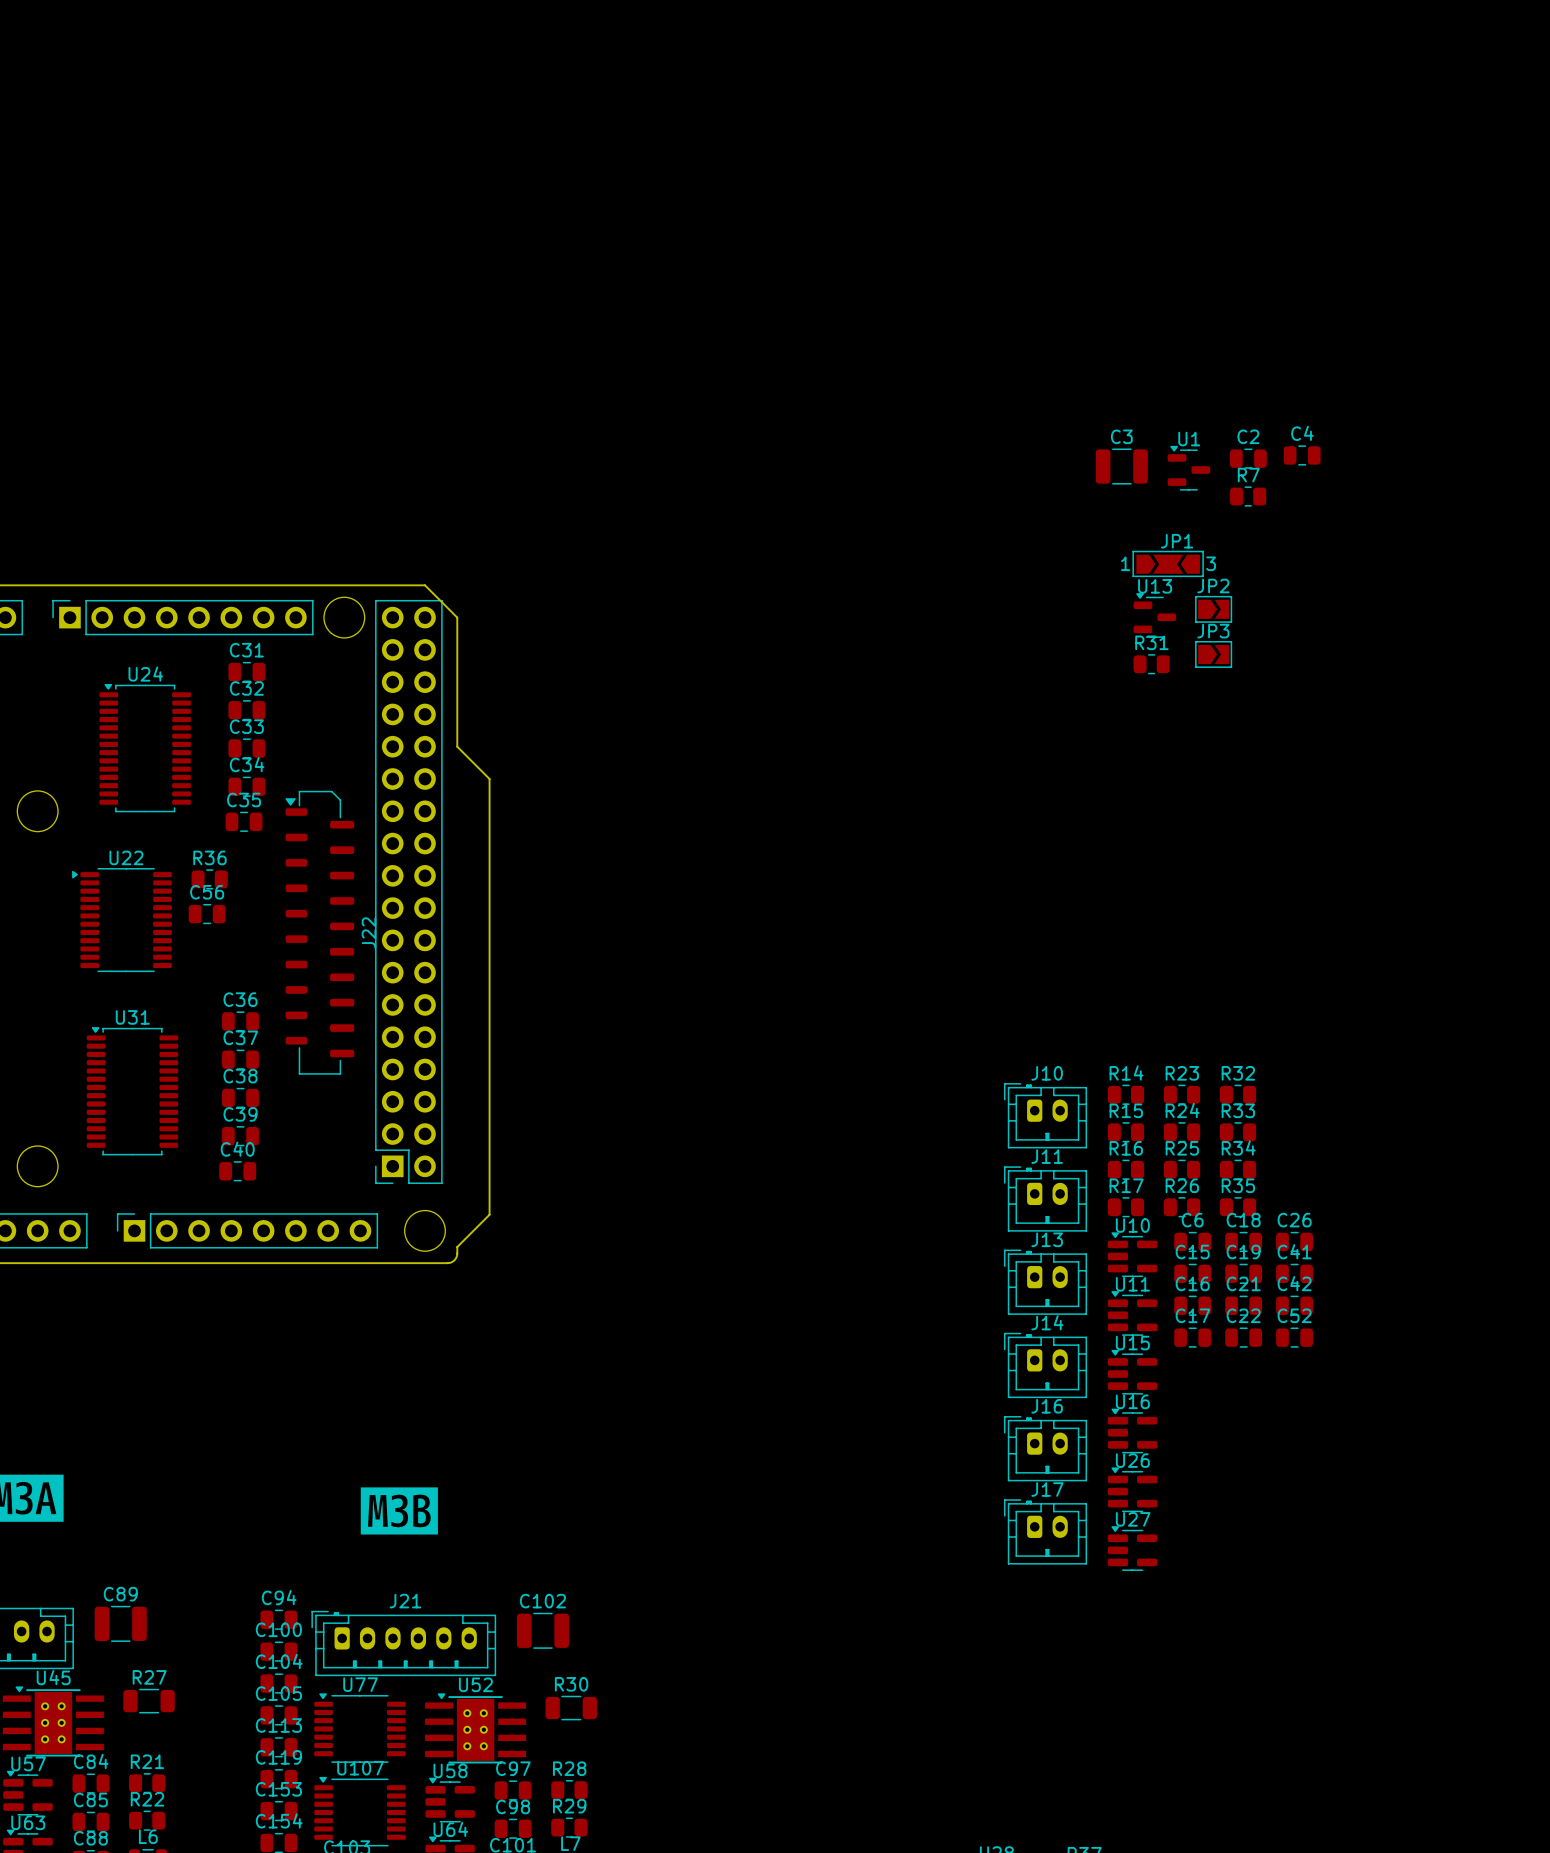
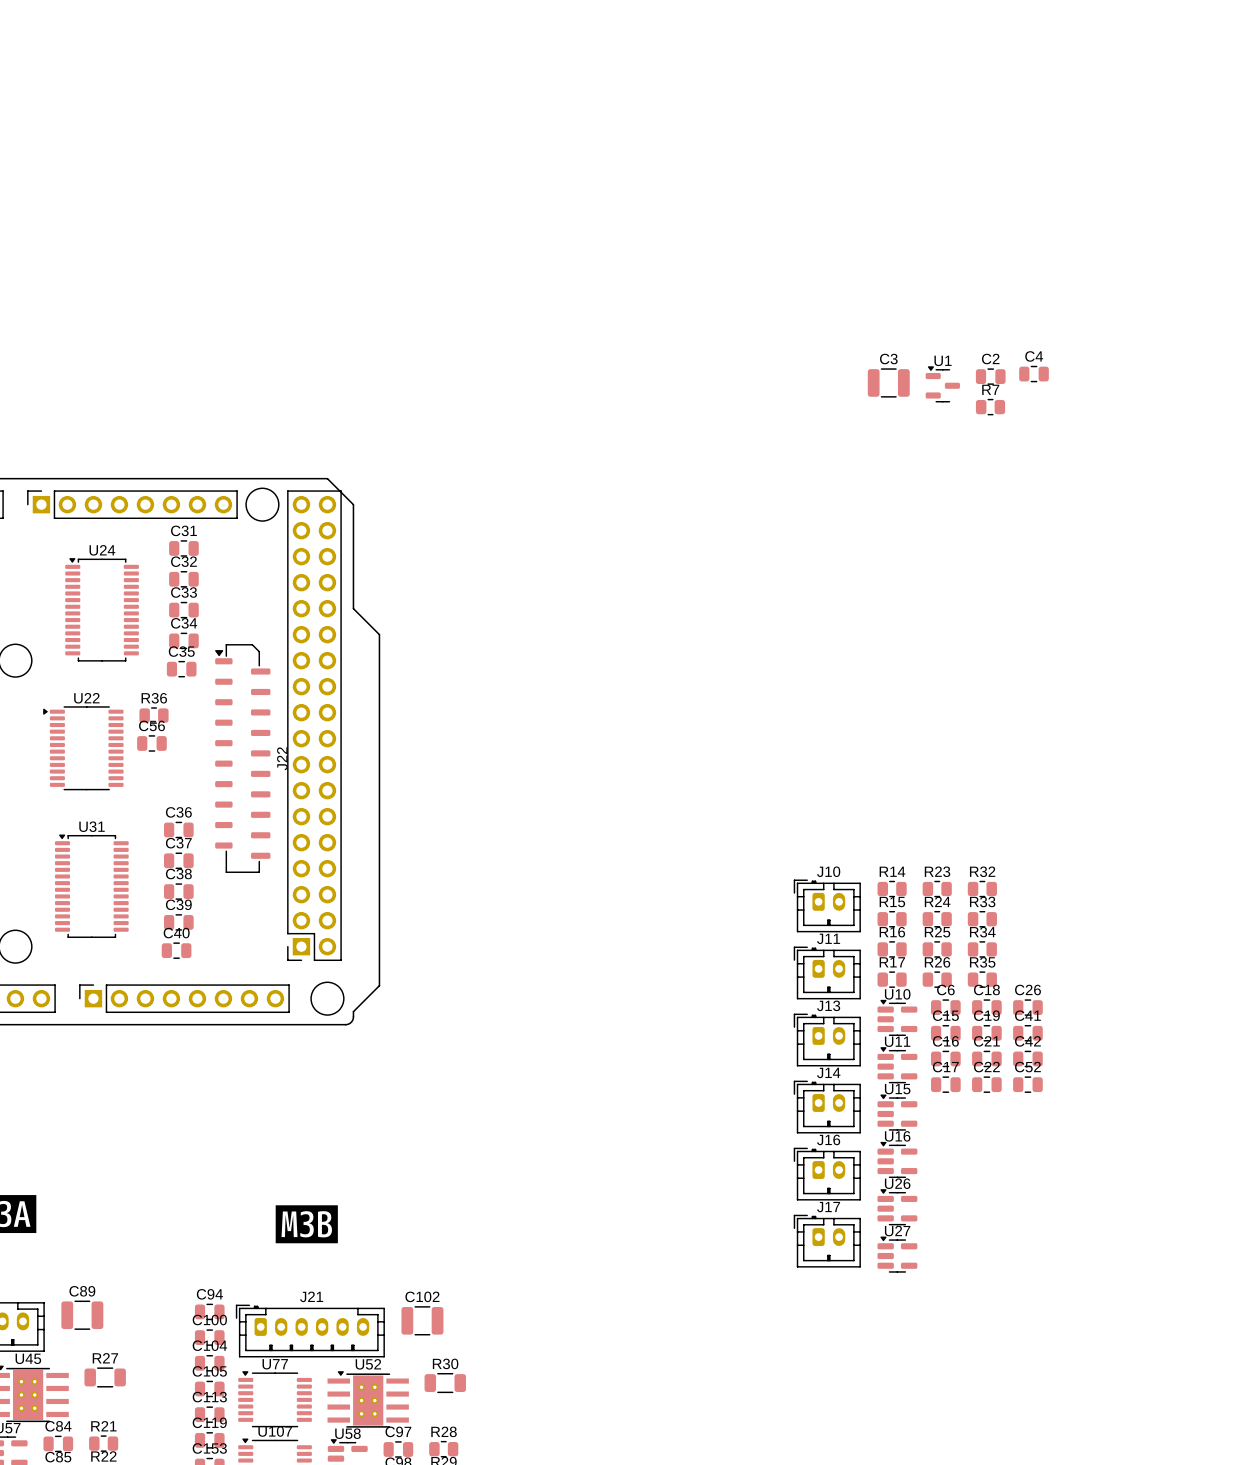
JP1: (1168, 563) -> none
JP2: (1213, 609) -> none
U13: (1154, 615) -> none
JP3: (1213, 654) -> none
R31: (1151, 664) -> none

